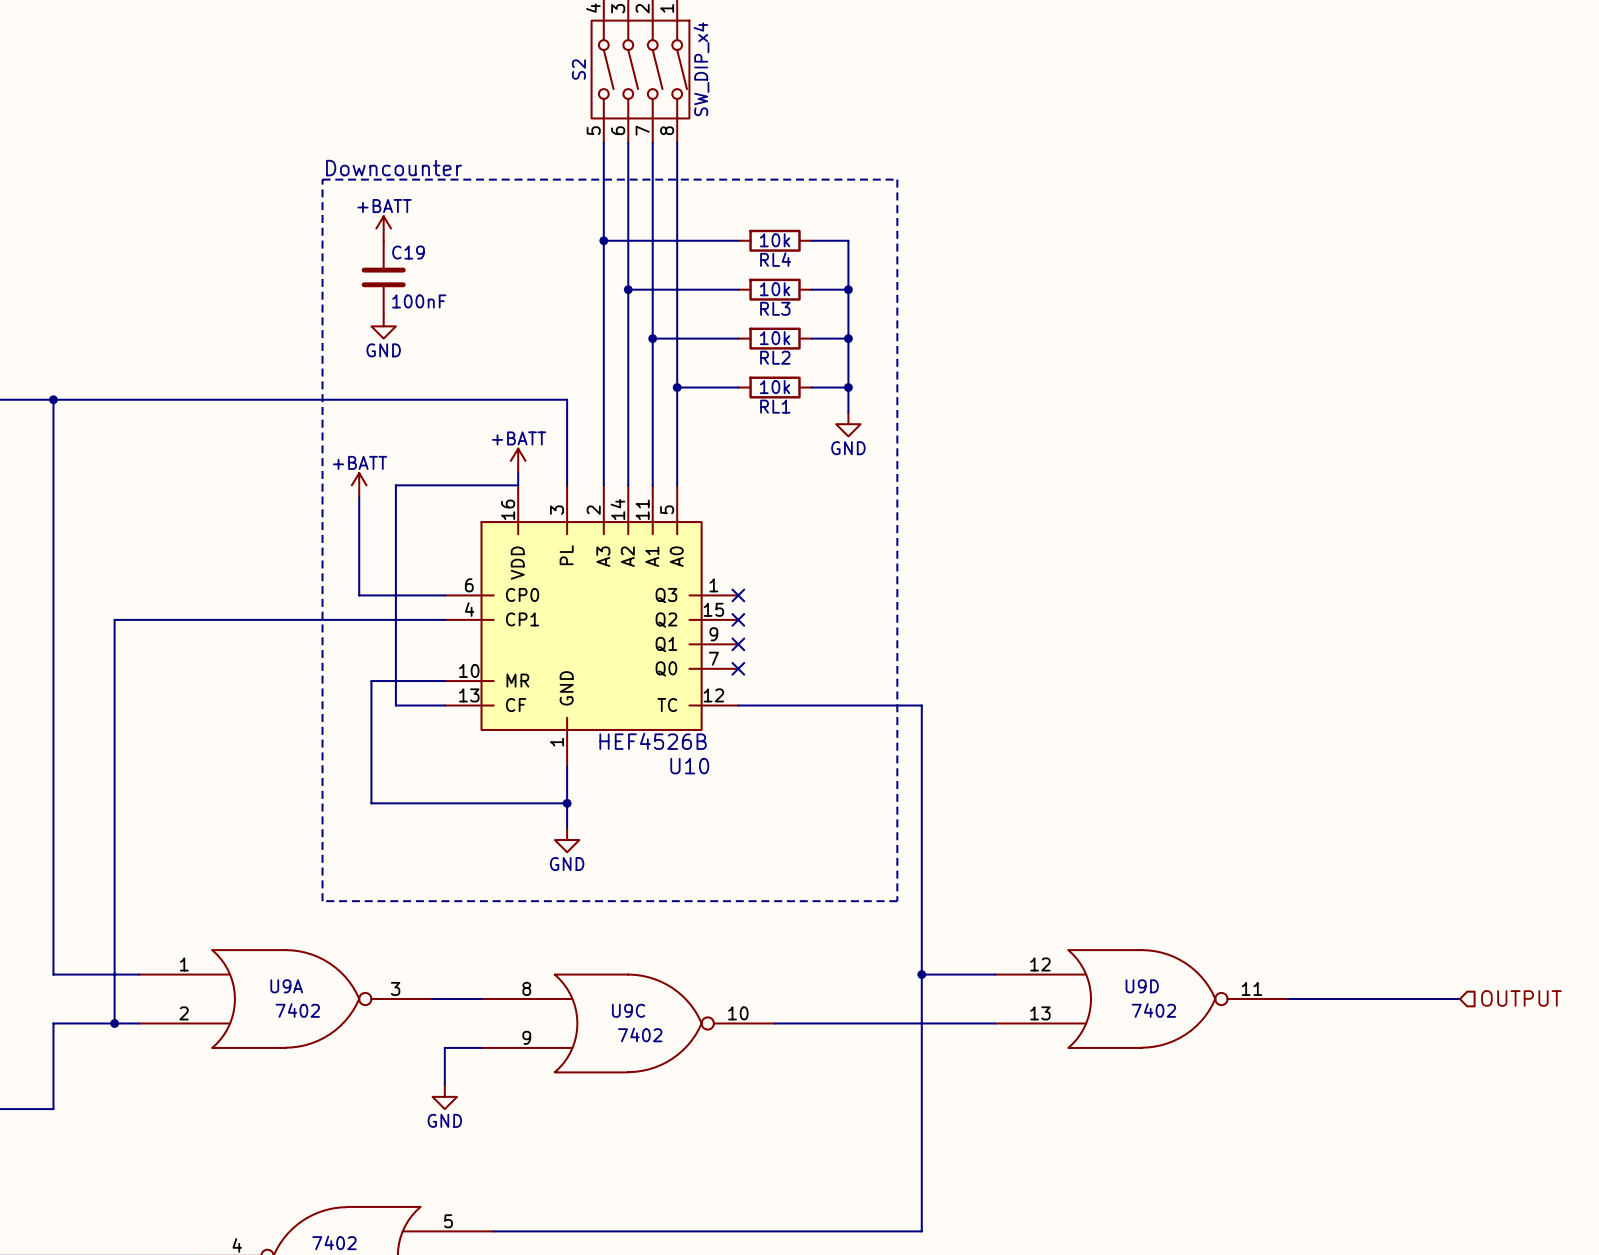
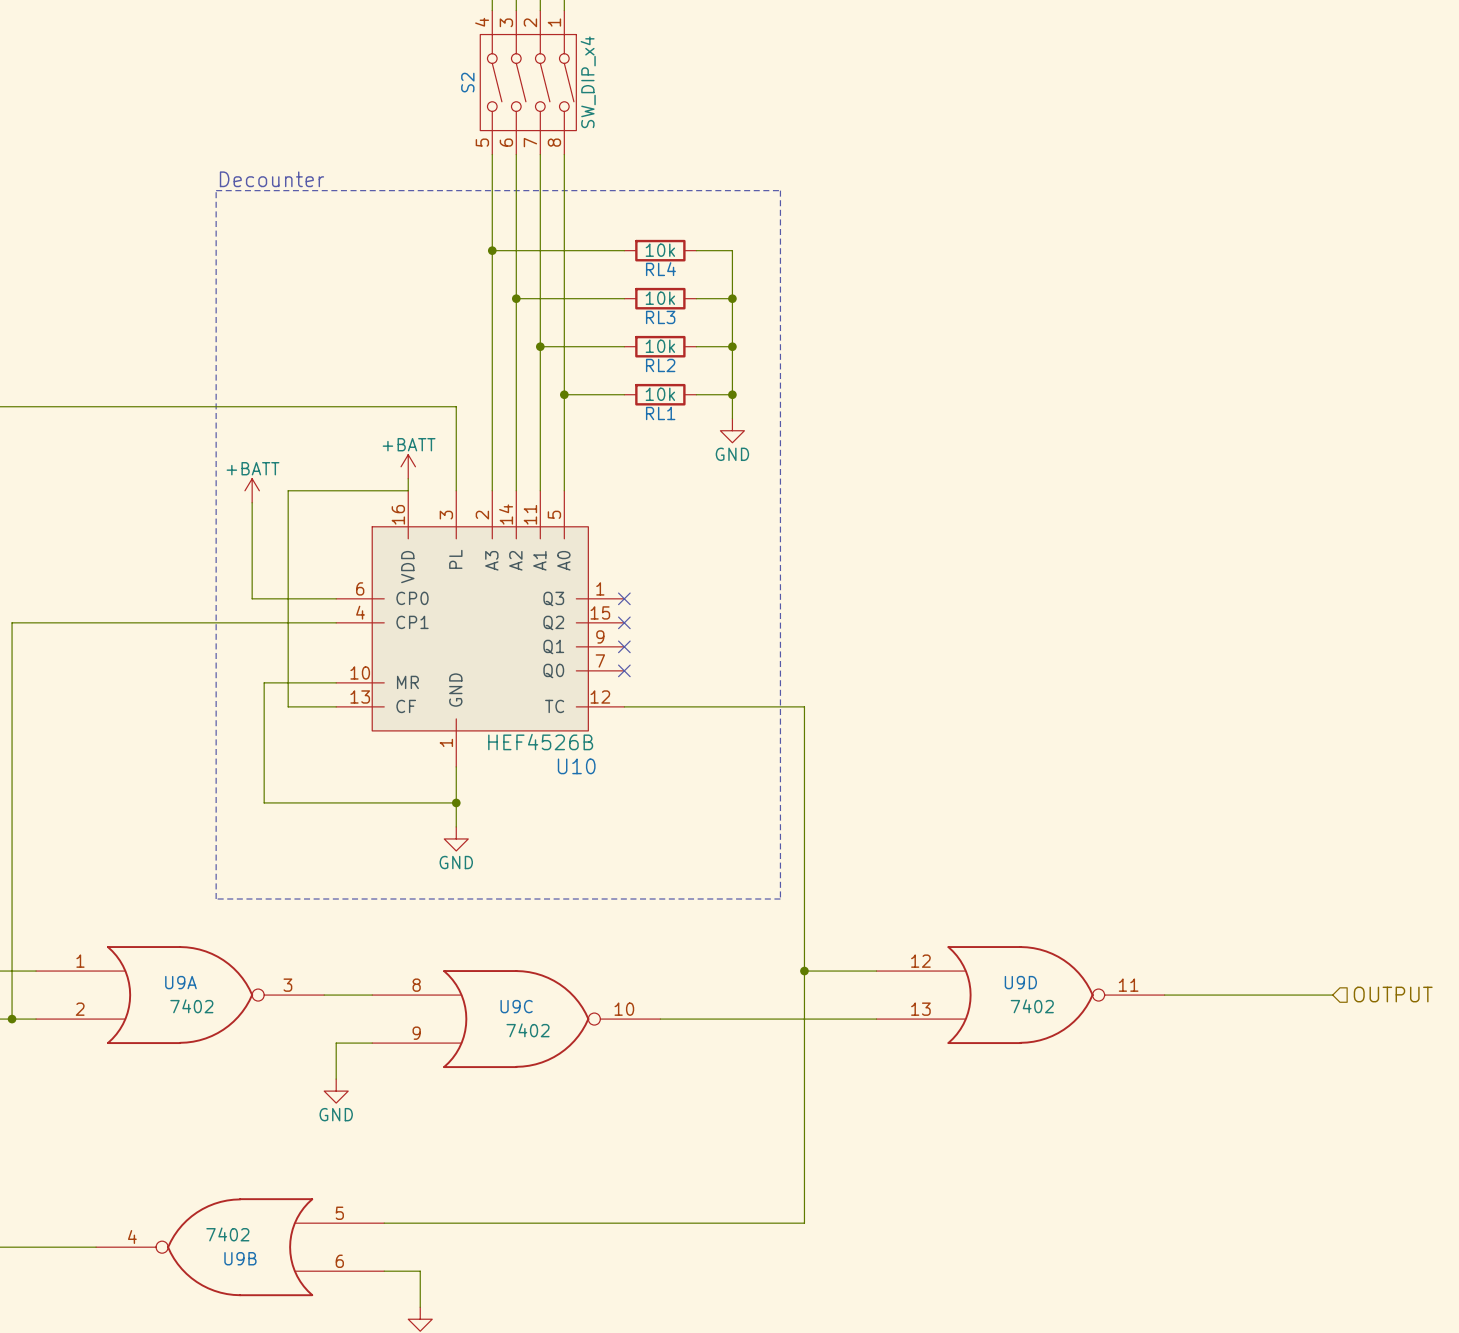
text: Downcounter (394, 168) -> Decounter (271, 179)
power symbol: +BATT (383, 228) -> none
C19: 100nF (383, 277) -> none
power symbol: GND (383, 326) -> none

